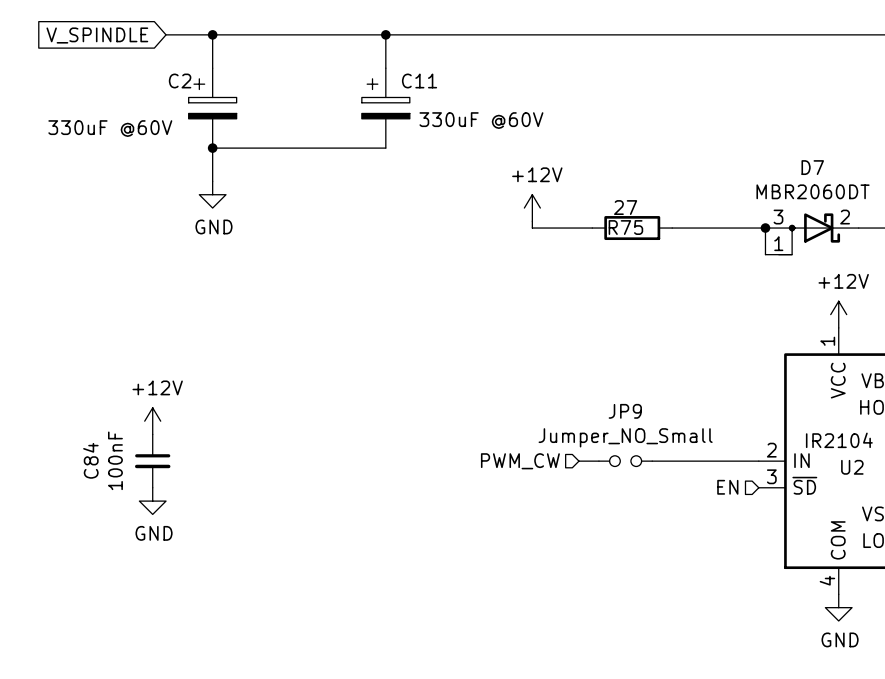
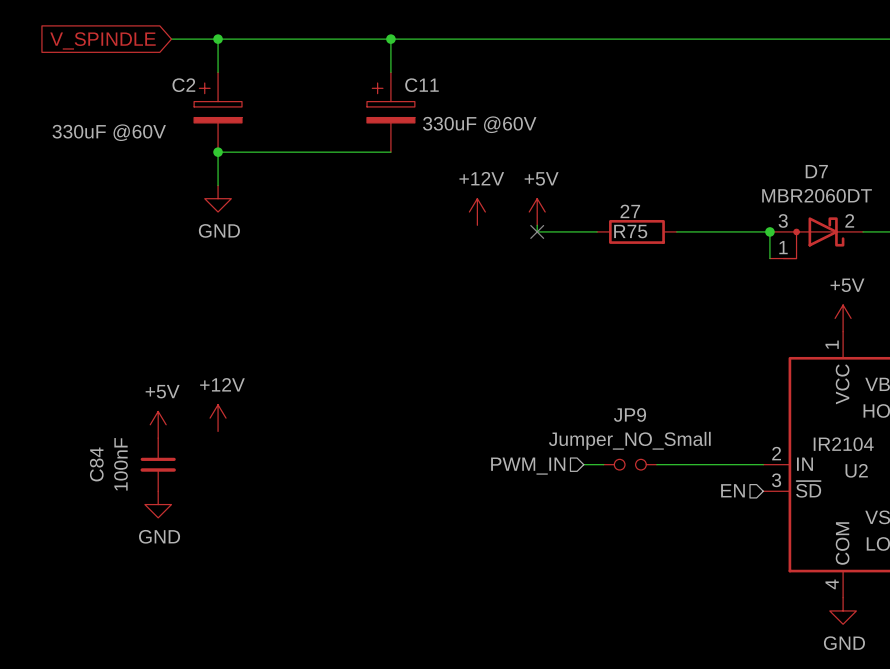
power symbol: none -> +12V (477, 212)
power symbol: +12V (532, 208) -> +5V (537, 212)
no-connect mark: none -> (537, 231)
power symbol: +12V (838, 314) -> +5V (843, 318)
power symbol: none -> +12V (218, 418)
power symbol: +12V (152, 421) -> +5V (158, 424)
hierarchical label: PWM_CW (520, 461) -> PWM_IN (528, 466)

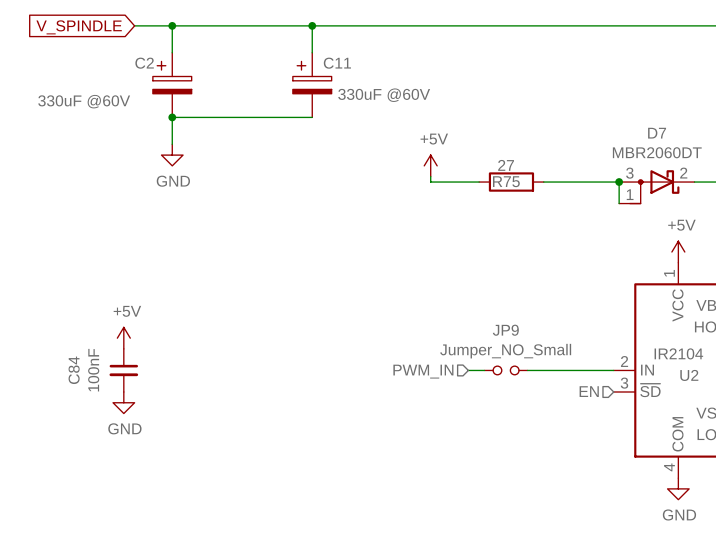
power symbol: +12V (477, 212) -> none
no-connect mark: (537, 231) -> none
power symbol: +12V (218, 418) -> none

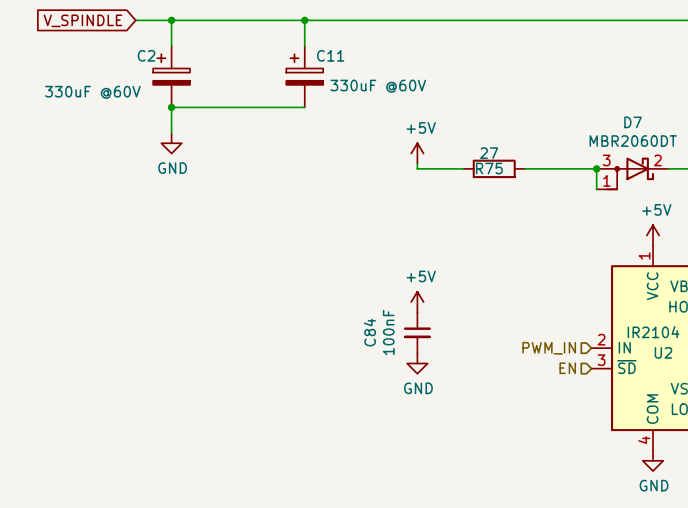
power symbol: none -> +5V (417, 302)
power symbol: +5V (123, 338) -> none
C84 position: (123, 370) -> (417, 332)
wire: (468, 370) (484, 370) -> none
JP9: Jumper_NO_Small (506, 370) -> none
wire: (527, 370) (613, 370) -> none
hierarchical label position: PWM_IN (423, 371) -> PWM_IN (549, 348)
power symbol: none -> GND (417, 363)
power symbol: GND (123, 402) -> none

